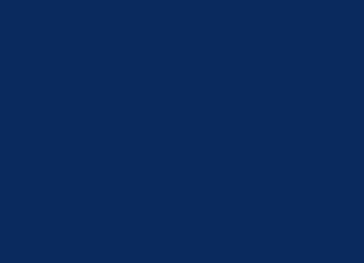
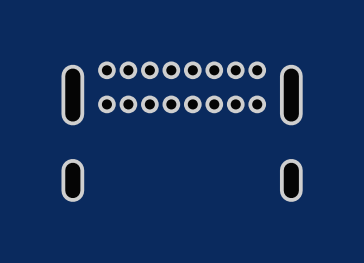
part: none -> (182, 131)

